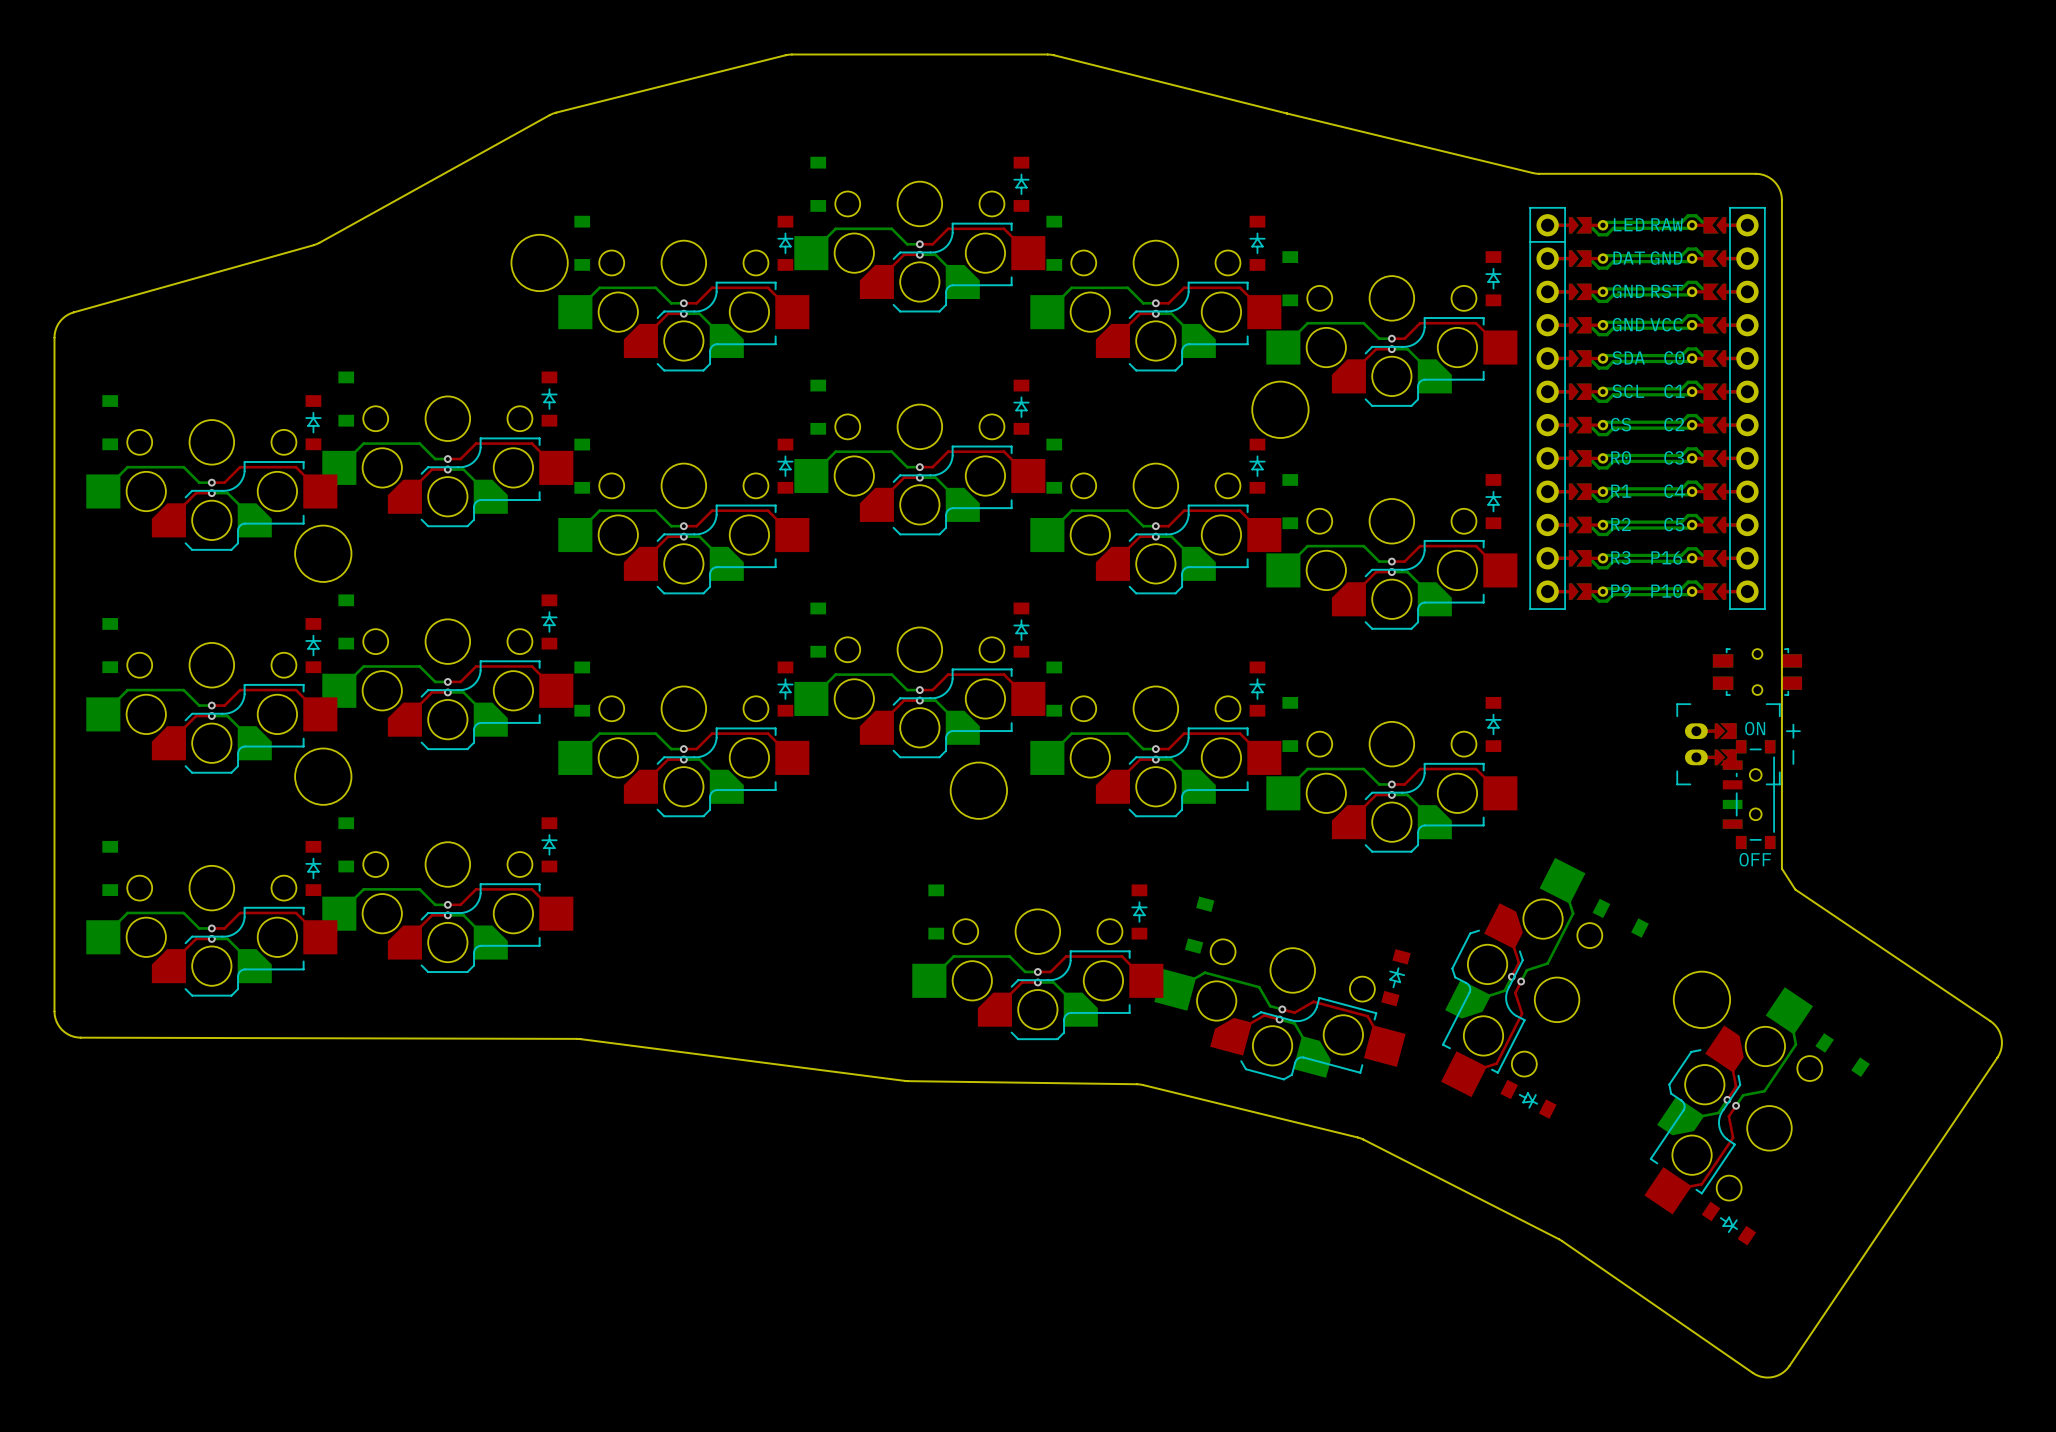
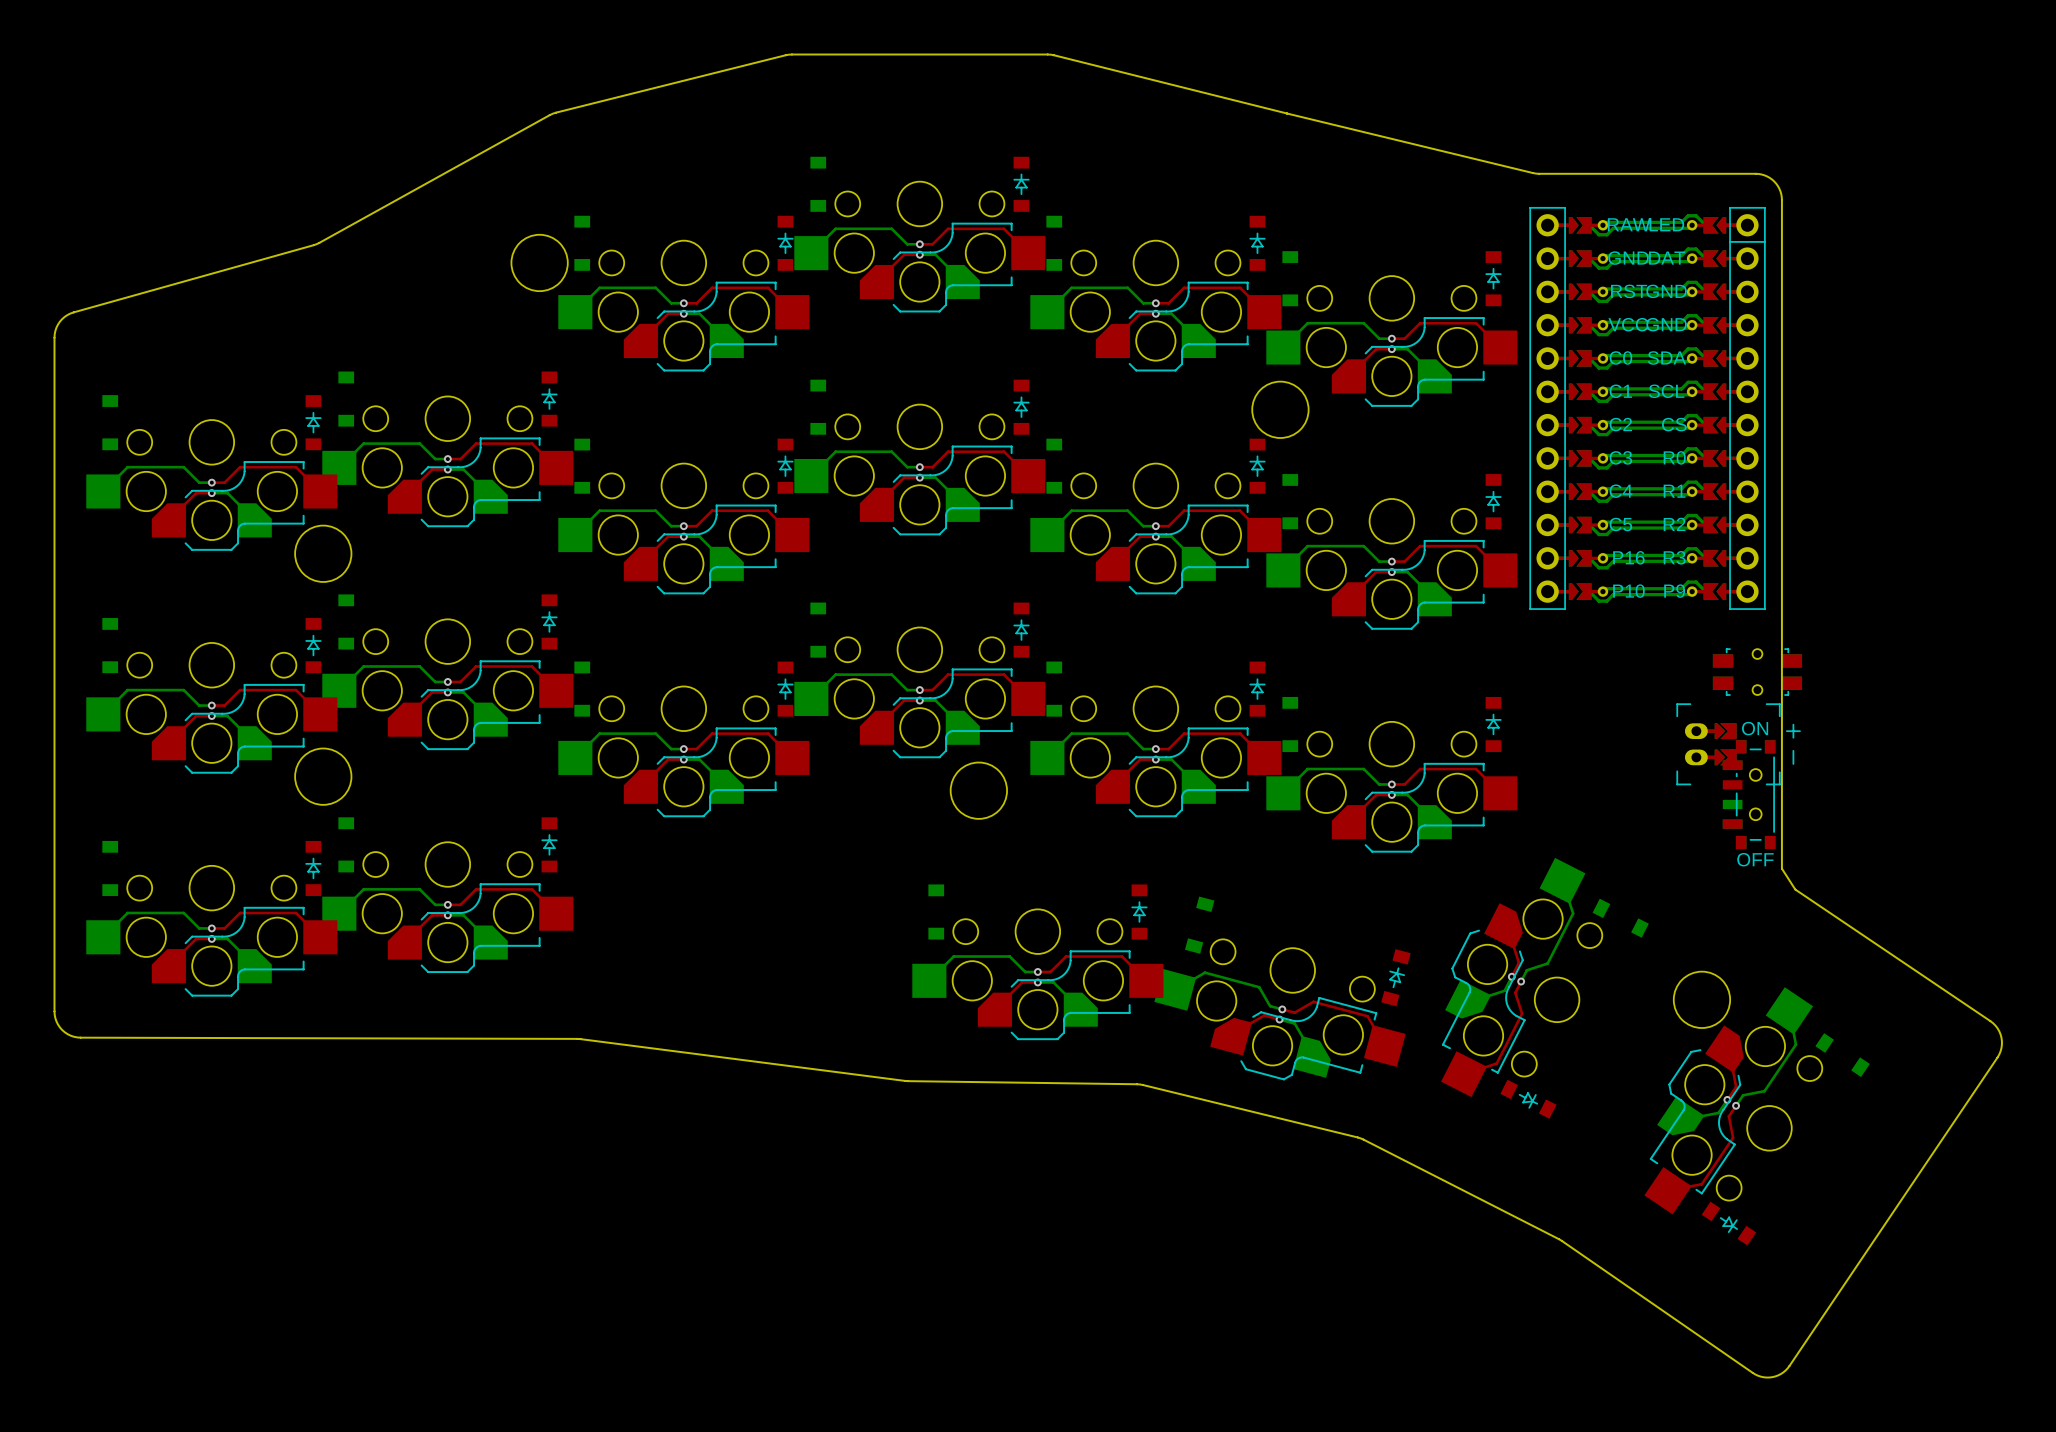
part footprint: [1529, 207, 1766, 610] -> [1529, 207, 1766, 610]

